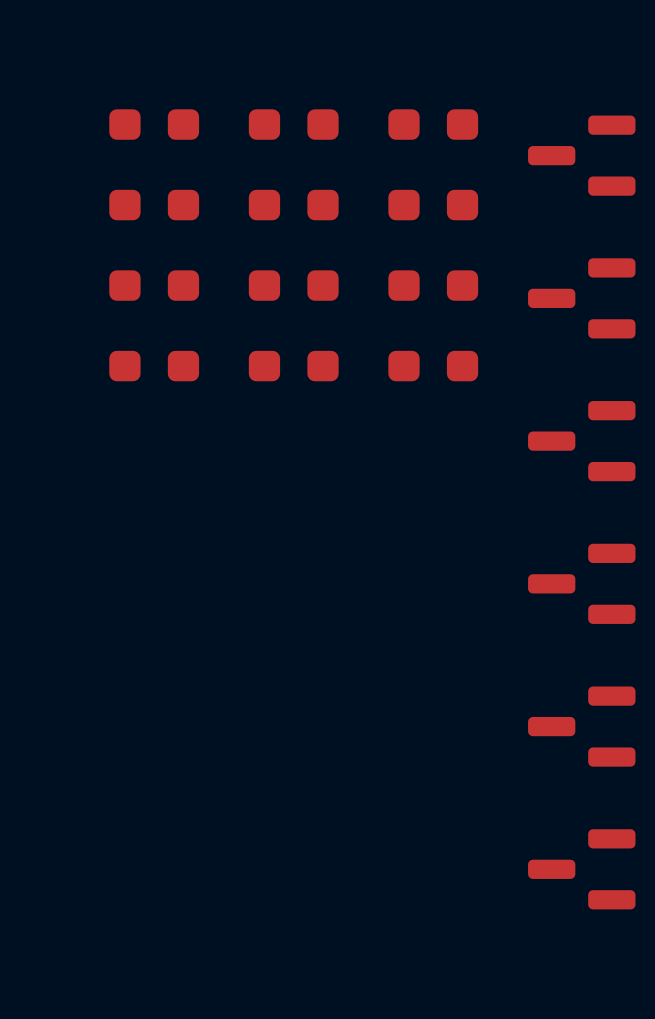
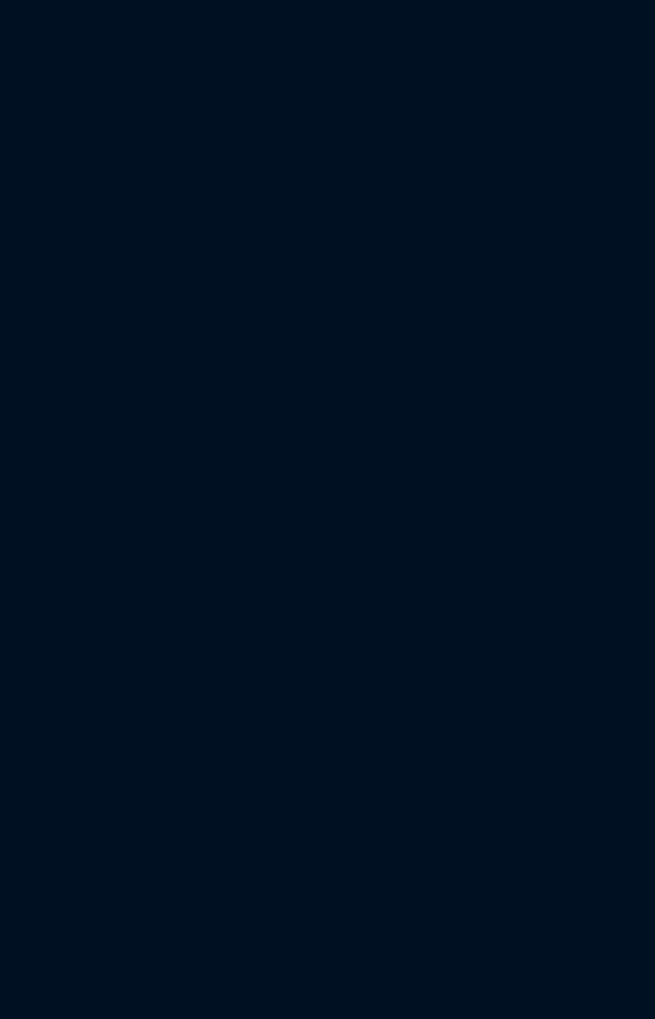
part: (154, 124) -> none
part: (293, 124) -> none
part: (433, 124) -> none
part: (581, 155) -> none
part: (154, 205) -> none
part: (293, 205) -> none
part: (433, 205) -> none
part: (154, 285) -> none
part: (293, 285) -> none
part: (433, 285) -> none
part: (581, 298) -> none
part: (154, 366) -> none
part: (293, 366) -> none
part: (433, 366) -> none
part: (581, 441) -> none
part: (581, 583) -> none
part: (581, 726) -> none
part: (581, 869) -> none

